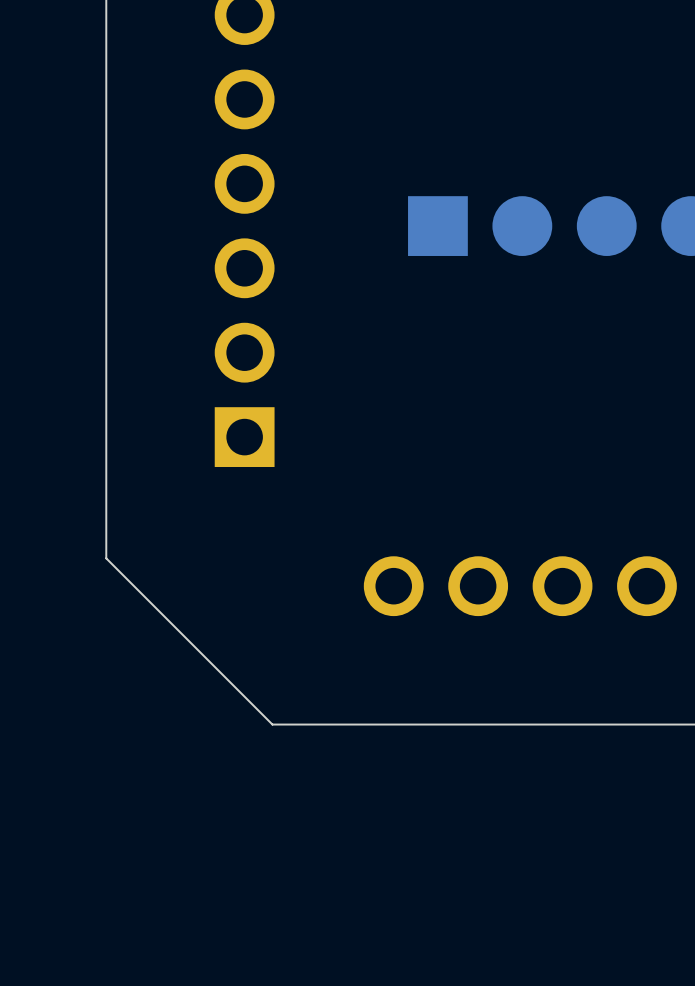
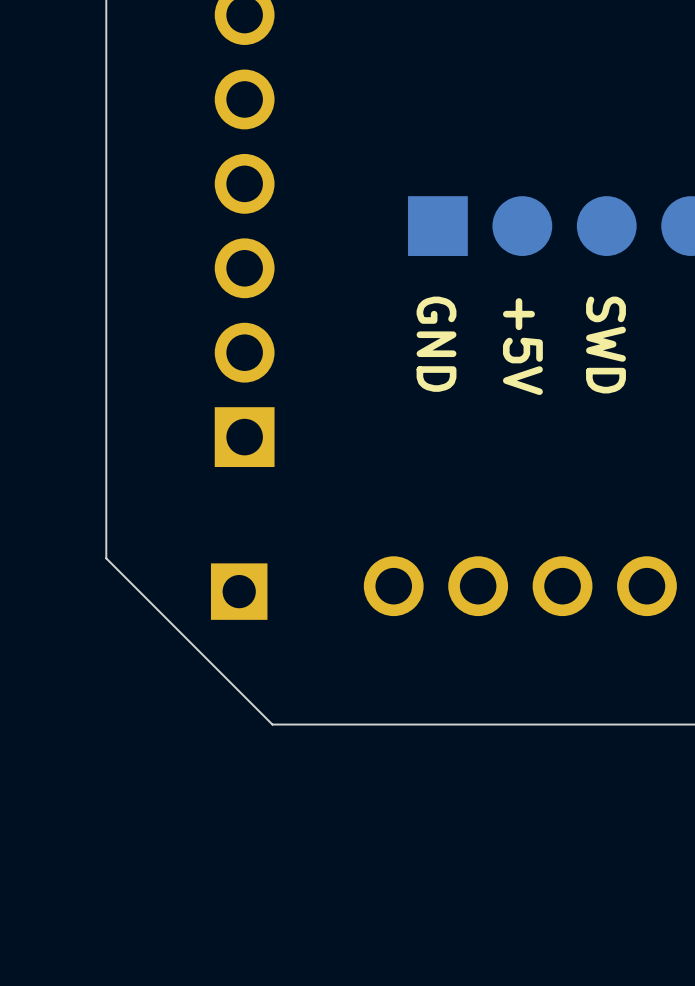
text: none -> GND (436, 344)
text: none -> SWD (606, 345)
text: none -> +5V (522, 346)
part: none -> (239, 591)

